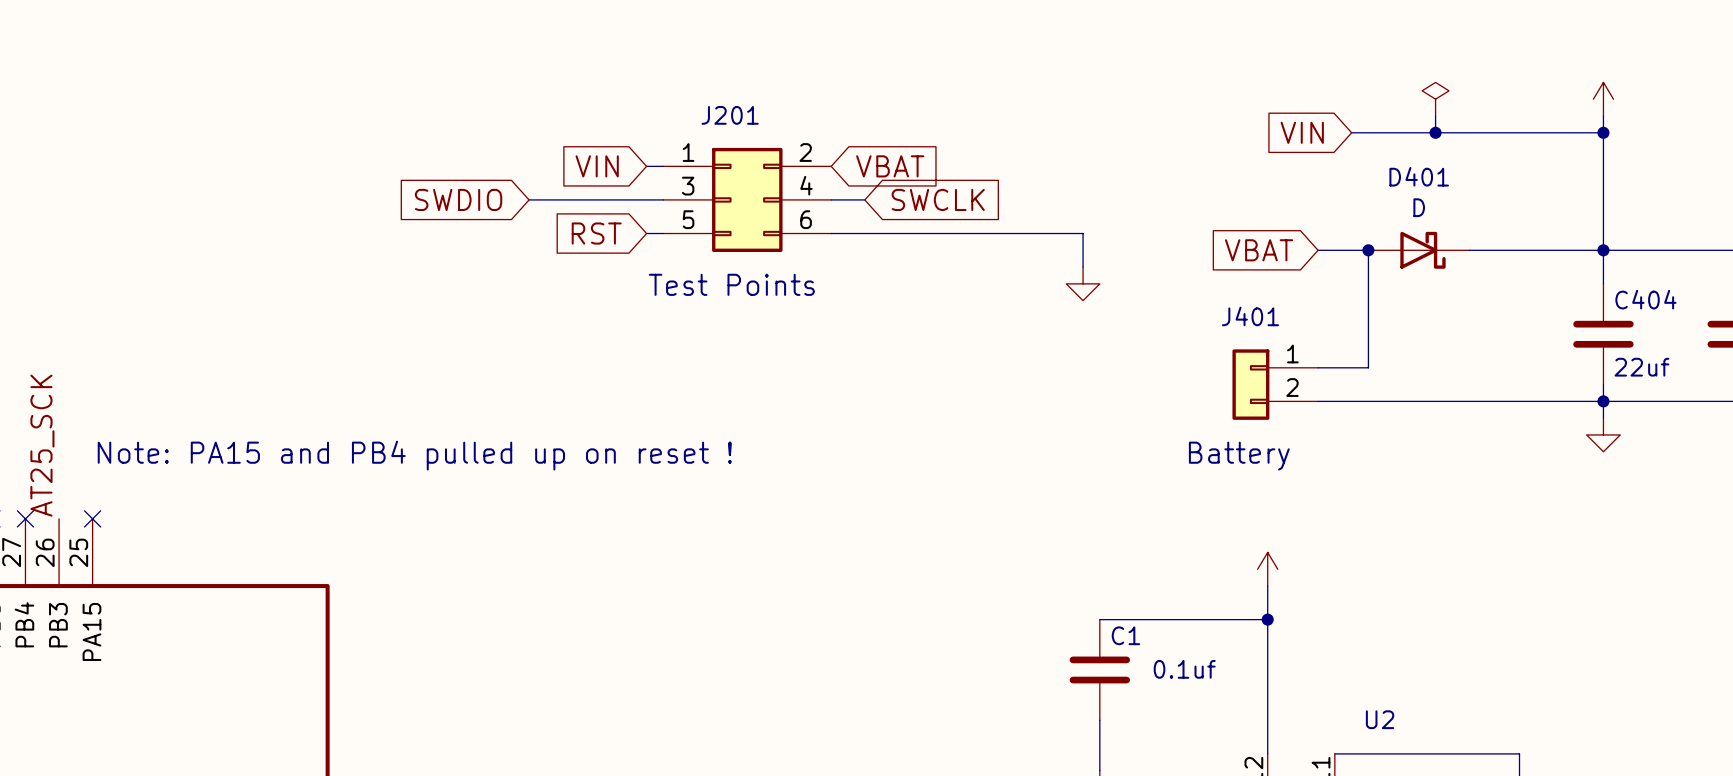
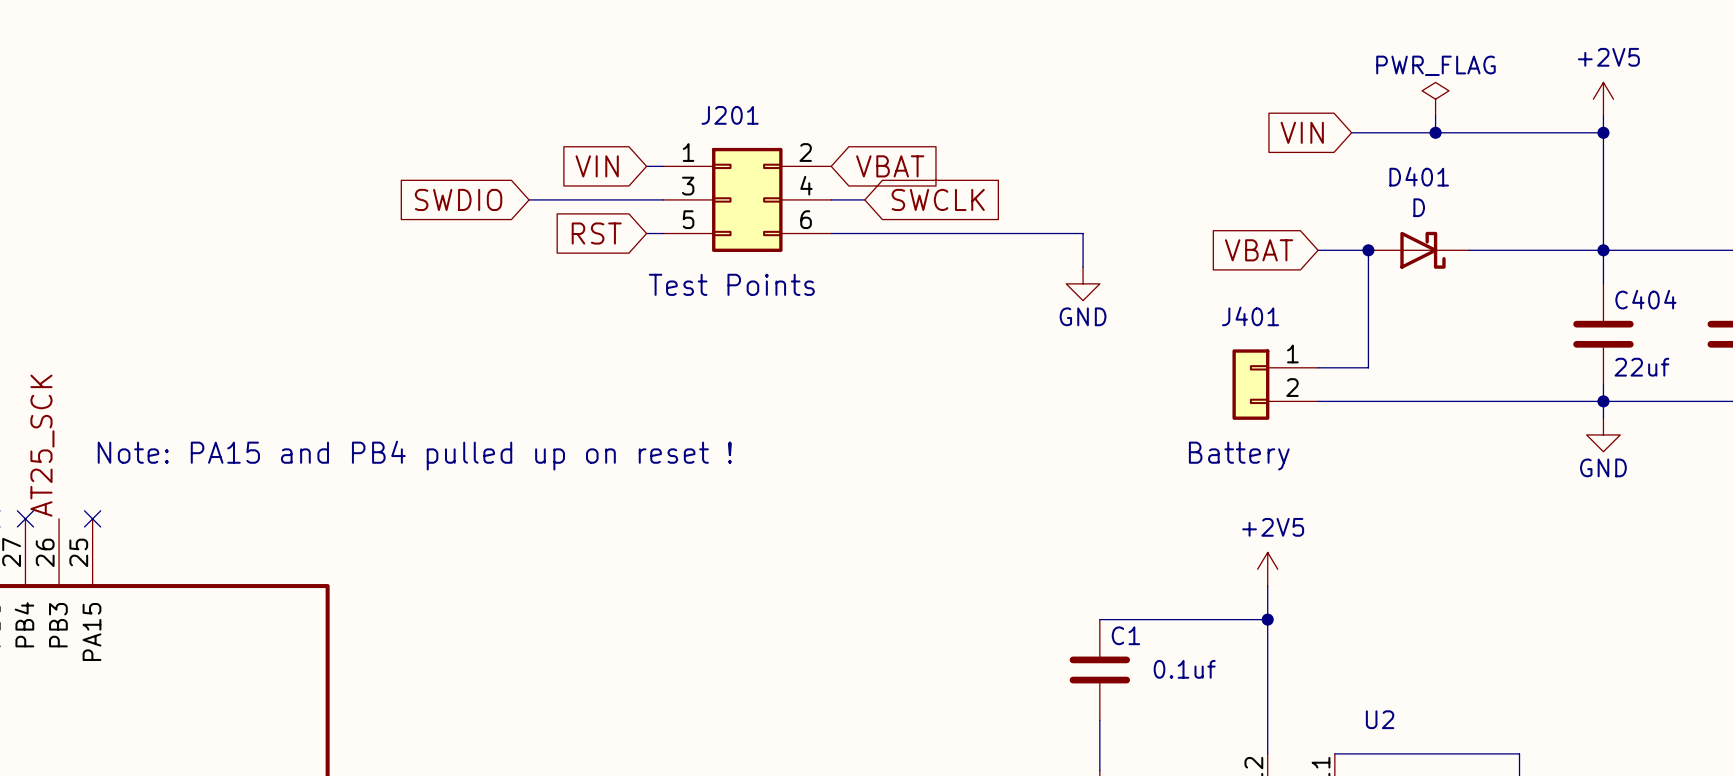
power symbol text: none -> +2V5 (1608, 57)
power symbol text: none -> PWR_FLAG (1435, 65)
power symbol text: none -> GND (1083, 316)
power symbol text: none -> GND (1603, 467)
power symbol text: none -> +2V5 (1273, 527)

